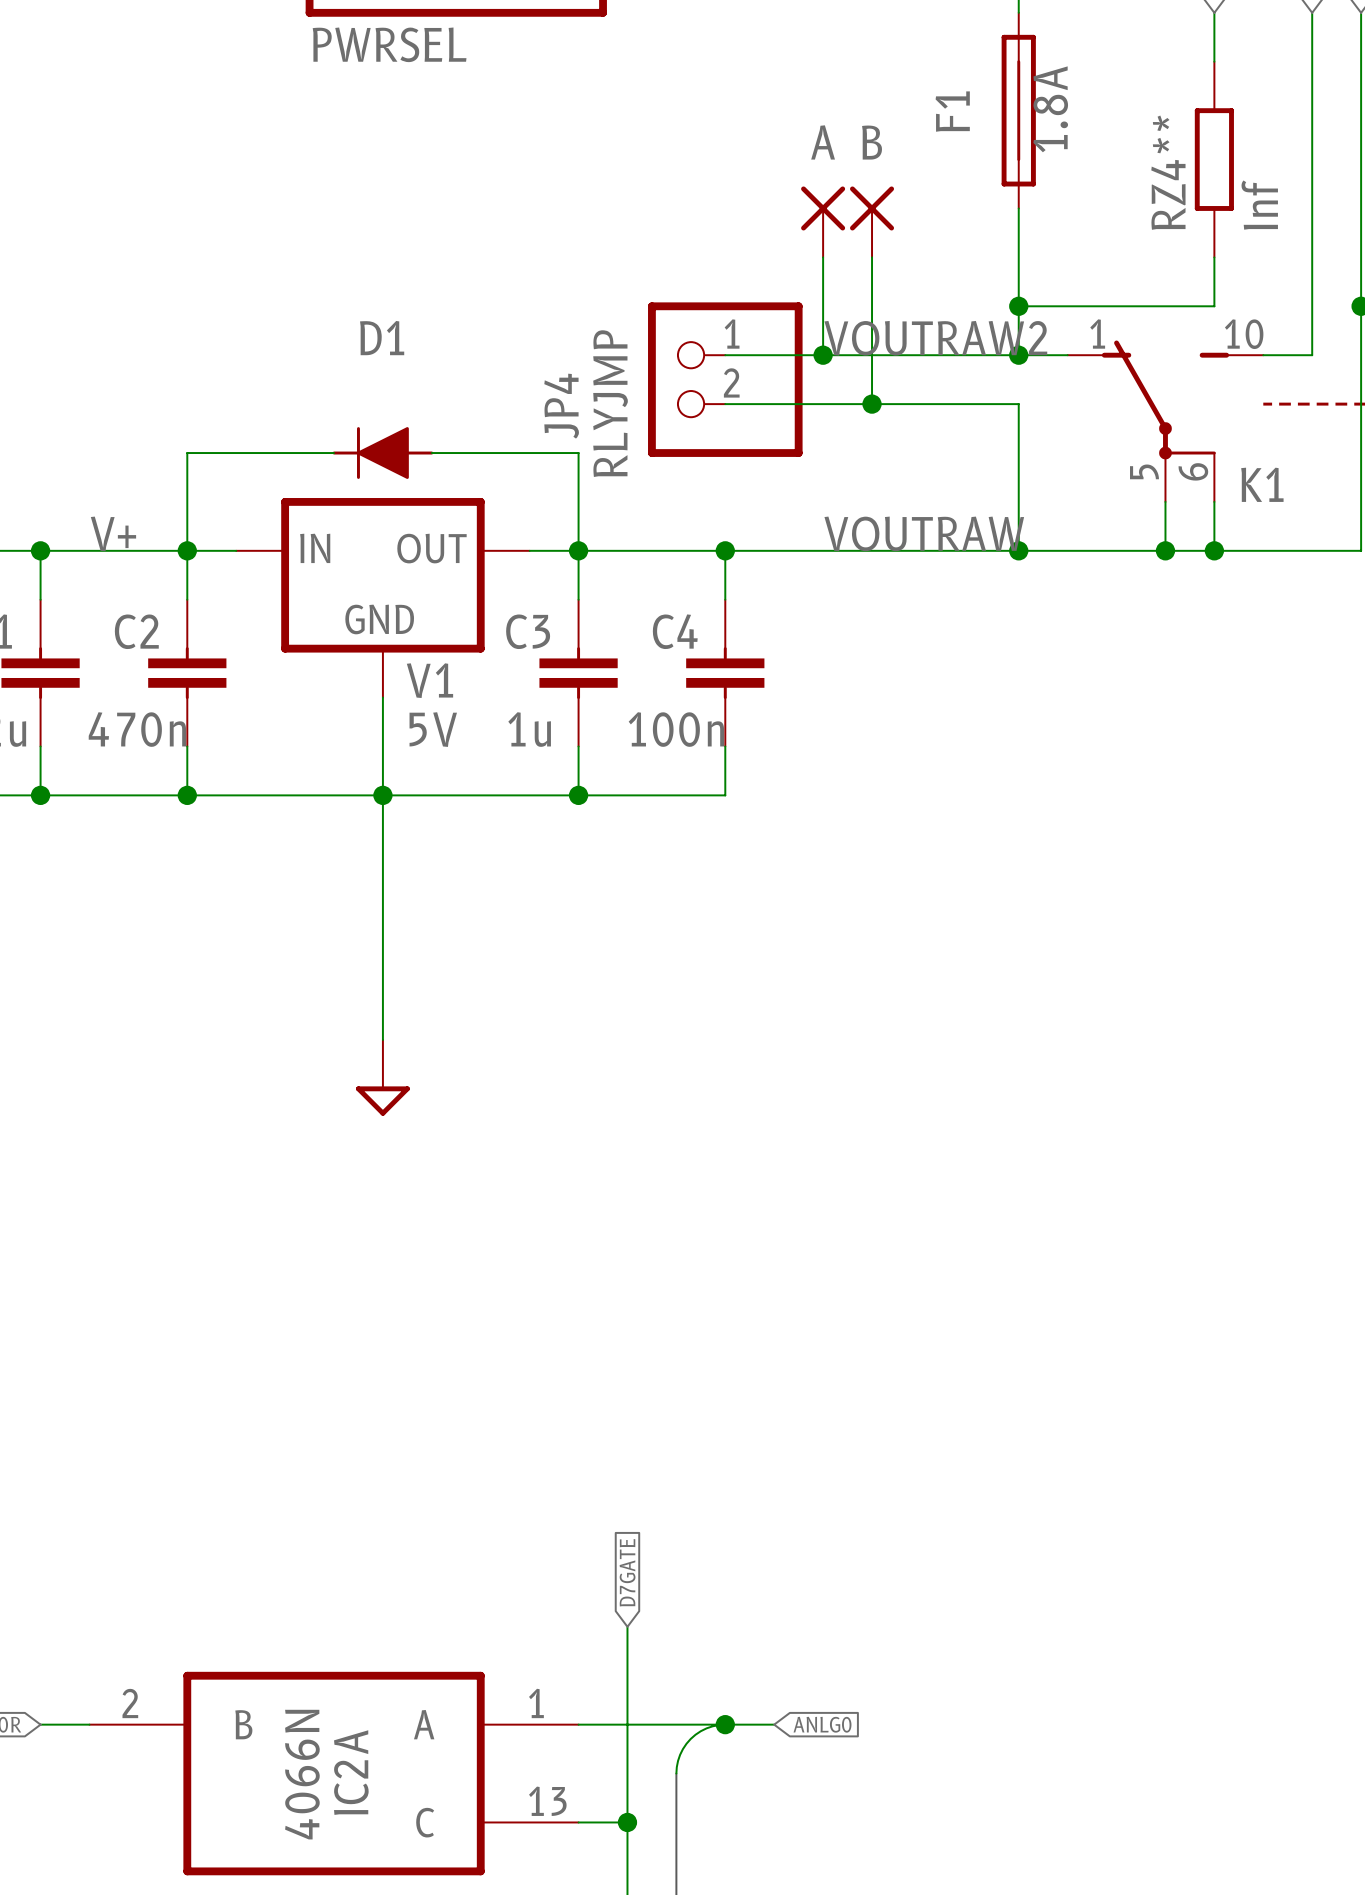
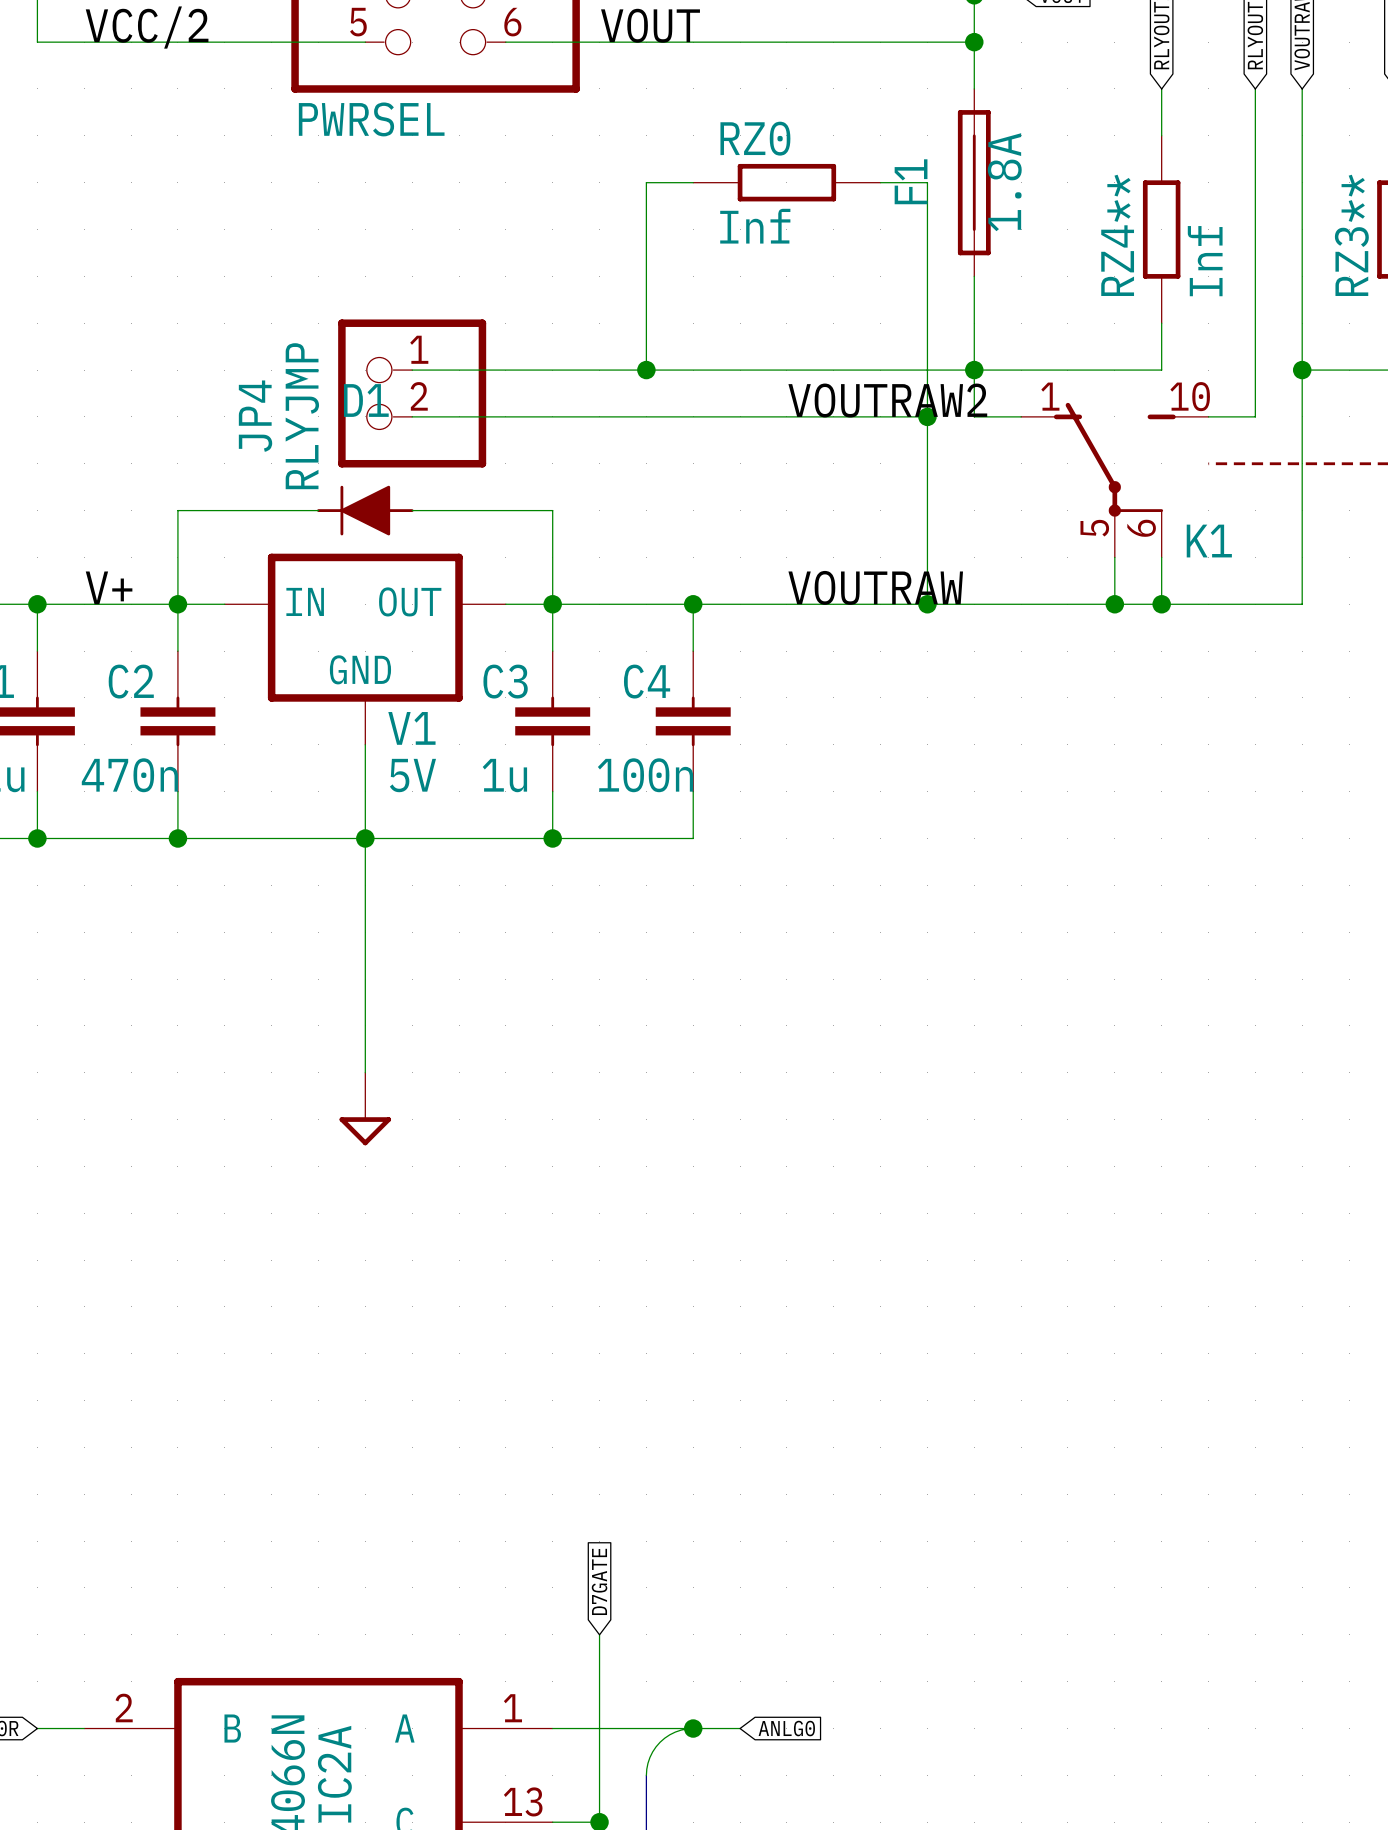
wire: none -> (693, 182) (646, 182) (646, 370)
RZ0: none -> Inf (786, 182)
wire: none -> (880, 182) (927, 182) (927, 604)
A: (823, 221) -> none
B: (872, 221) -> none
wire: (823, 257) (823, 355) -> none
wire: (872, 257) (872, 404) -> none
wire: none -> (412, 370) (974, 370)
junction: none -> (646, 370)
wire: none -> (412, 416) (693, 416)
junction: (823, 355) -> none
wire: (969, 355) (1018, 355) -> none
junction position: (1018, 355) -> (927, 416)
JP4 position: (725, 379) -> (412, 393)
wire: (725, 404) (1018, 404) (1018, 550) -> none
junction: (872, 404) -> none
junction position: (1018, 550) -> (927, 604)

